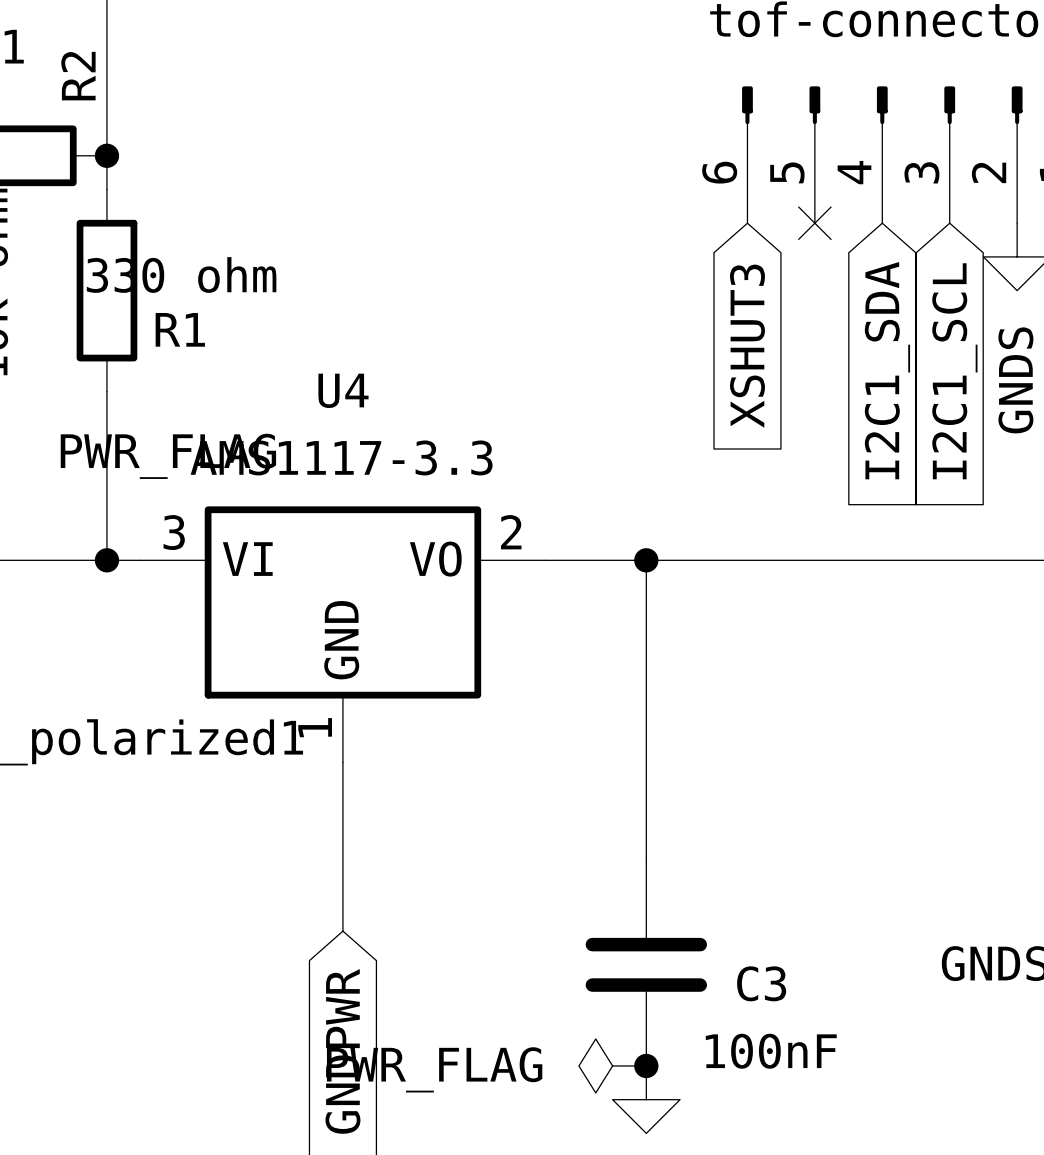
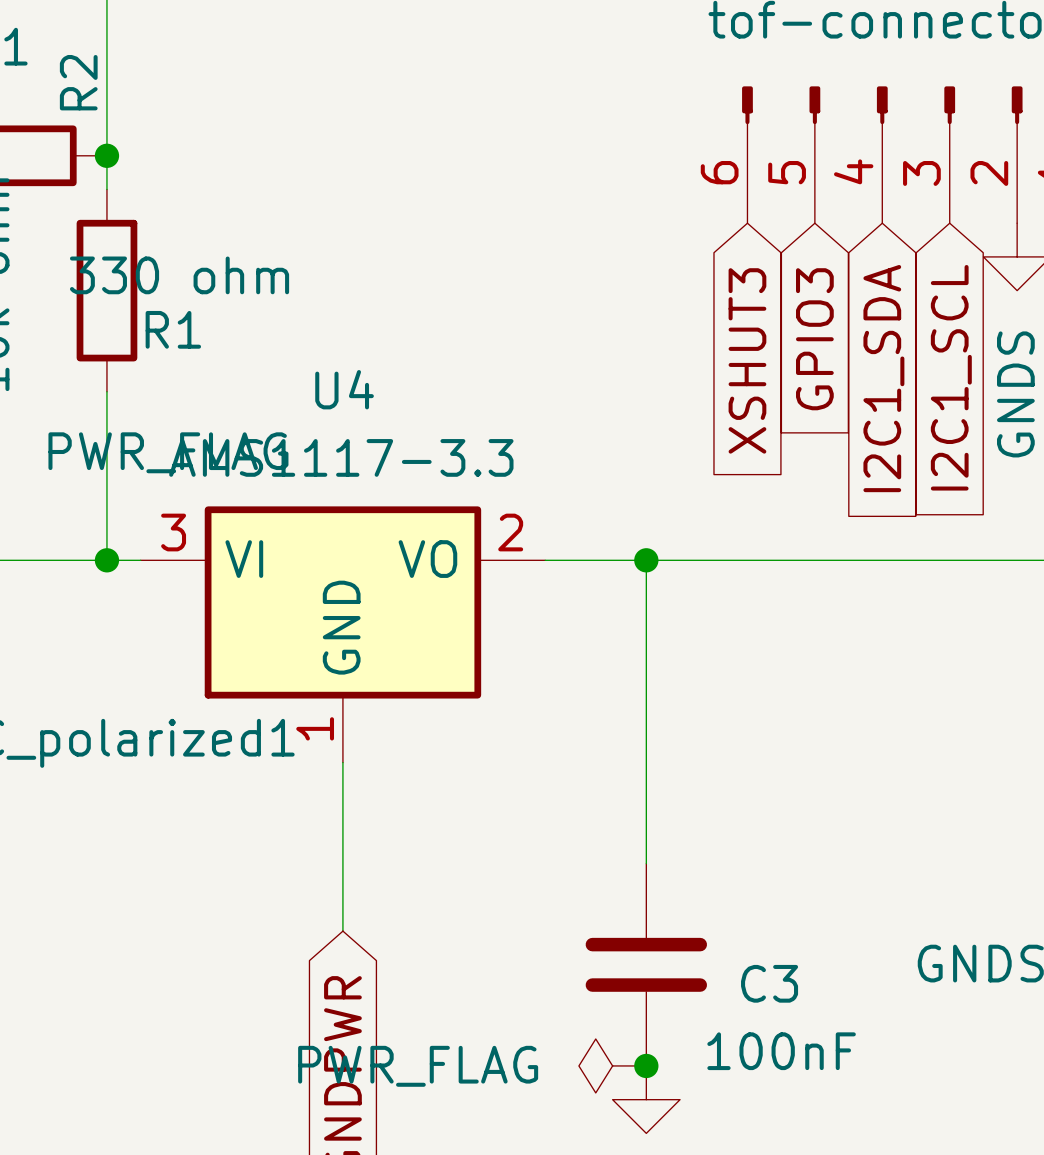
no-connect mark: (814, 223) -> none
global label: none -> GPIO3 (814, 339)

